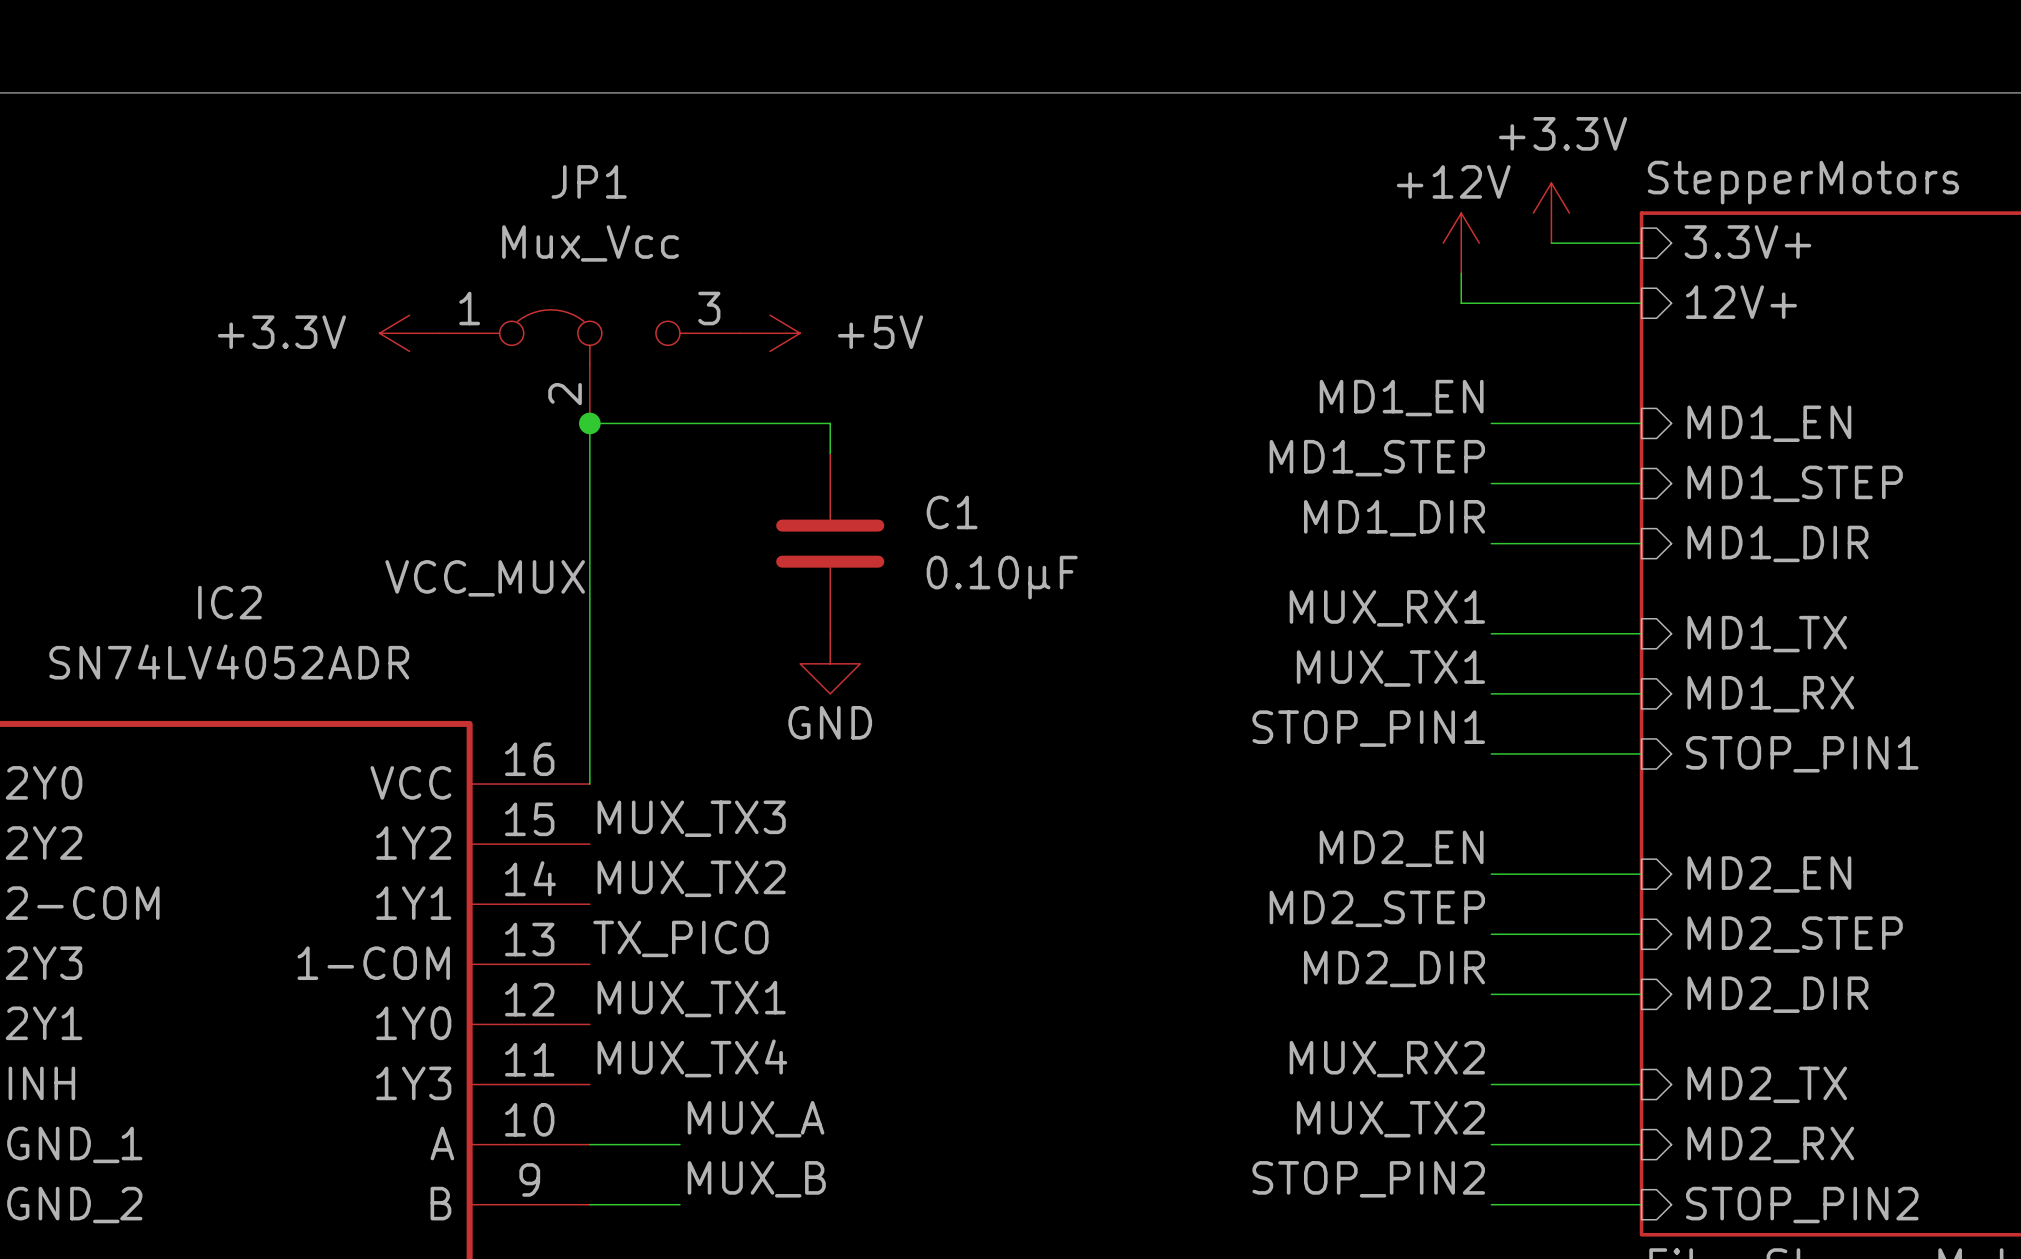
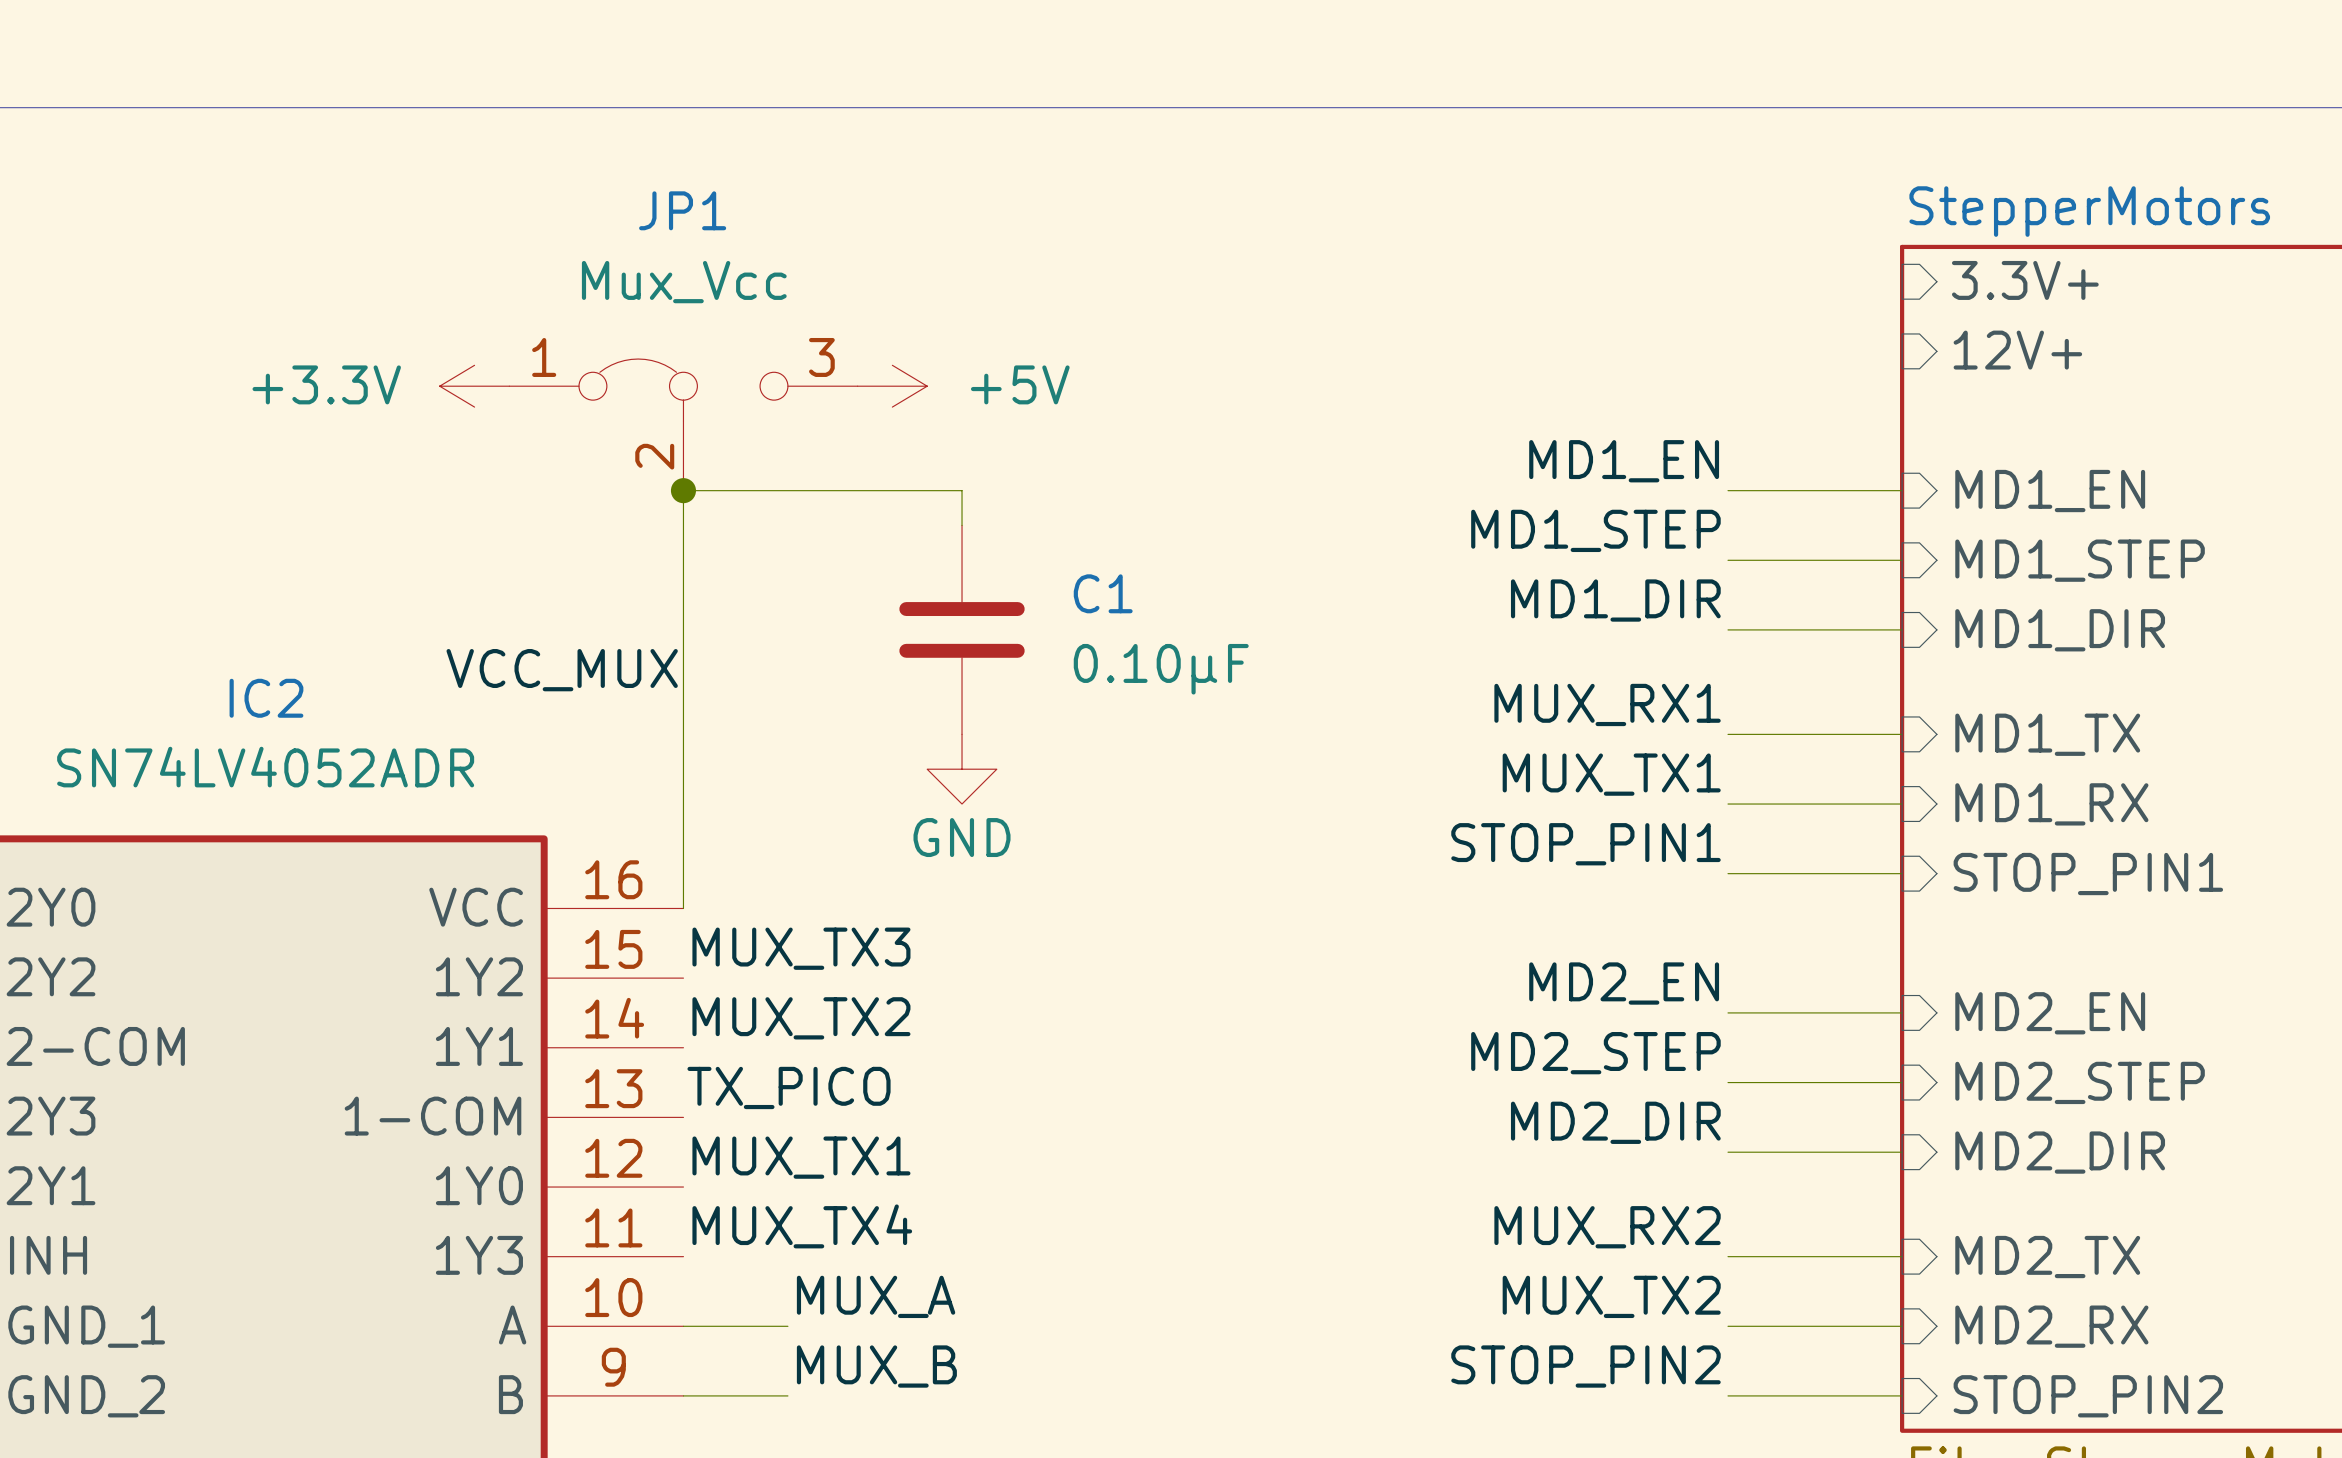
power symbol: +3.3V (1551, 213) -> none
power symbol: +12V (1461, 243) -> none
wire: (1551, 243) (1641, 243) -> none
wire: (1461, 273) (1461, 303) (1641, 303) -> none

